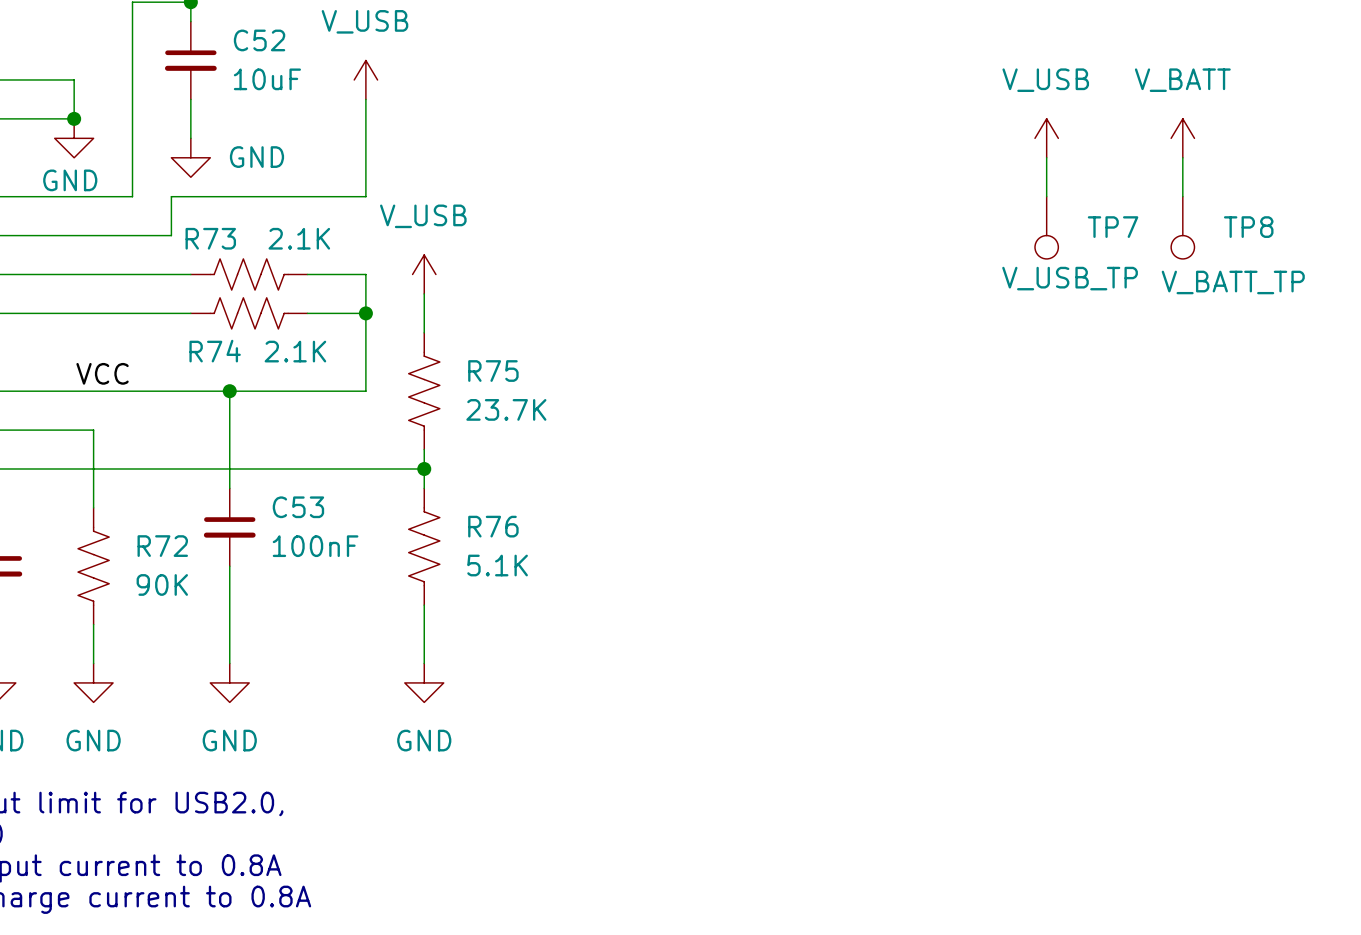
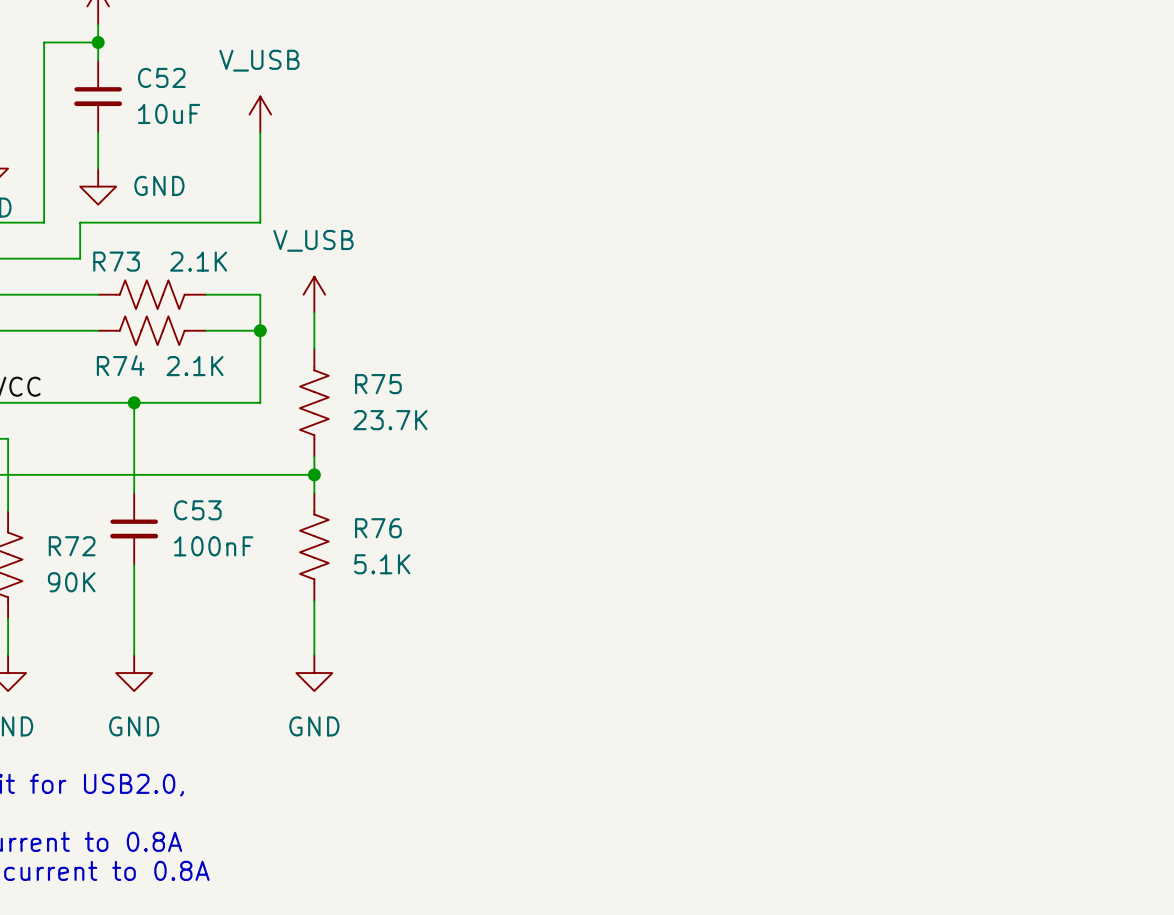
power symbol: V_USB (1046, 138) -> none
power symbol: V_BATT (1182, 138) -> none
wire: (1046, 157) (1046, 196) -> none
wire: (1182, 157) (1182, 196) -> none
TP7: V_USB_TP (1046, 227) -> none
TP8: V_BATT_TP (1182, 227) -> none

